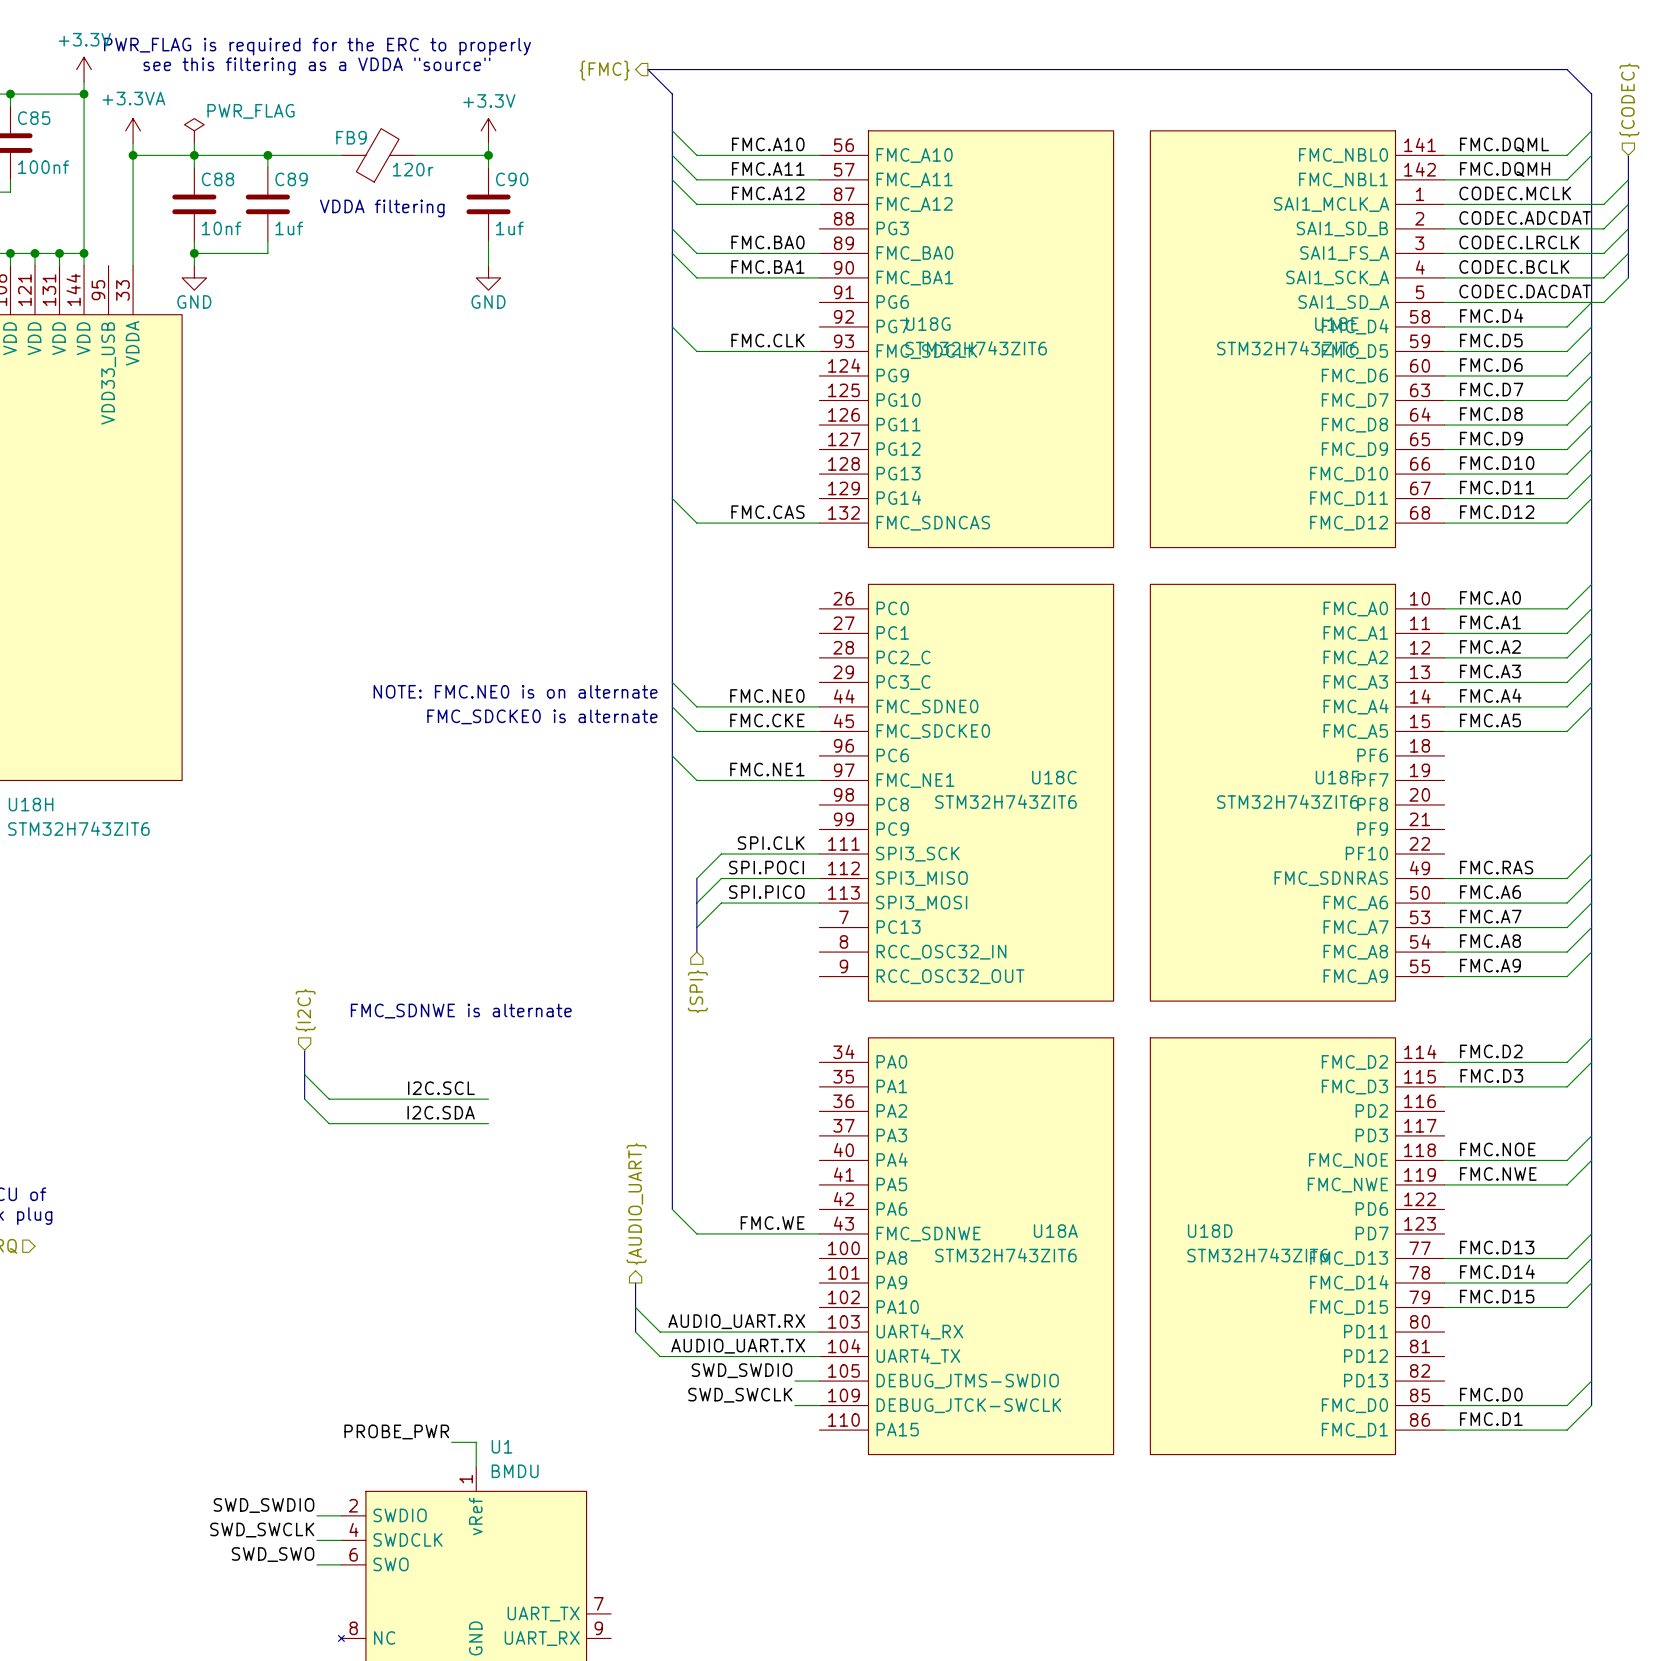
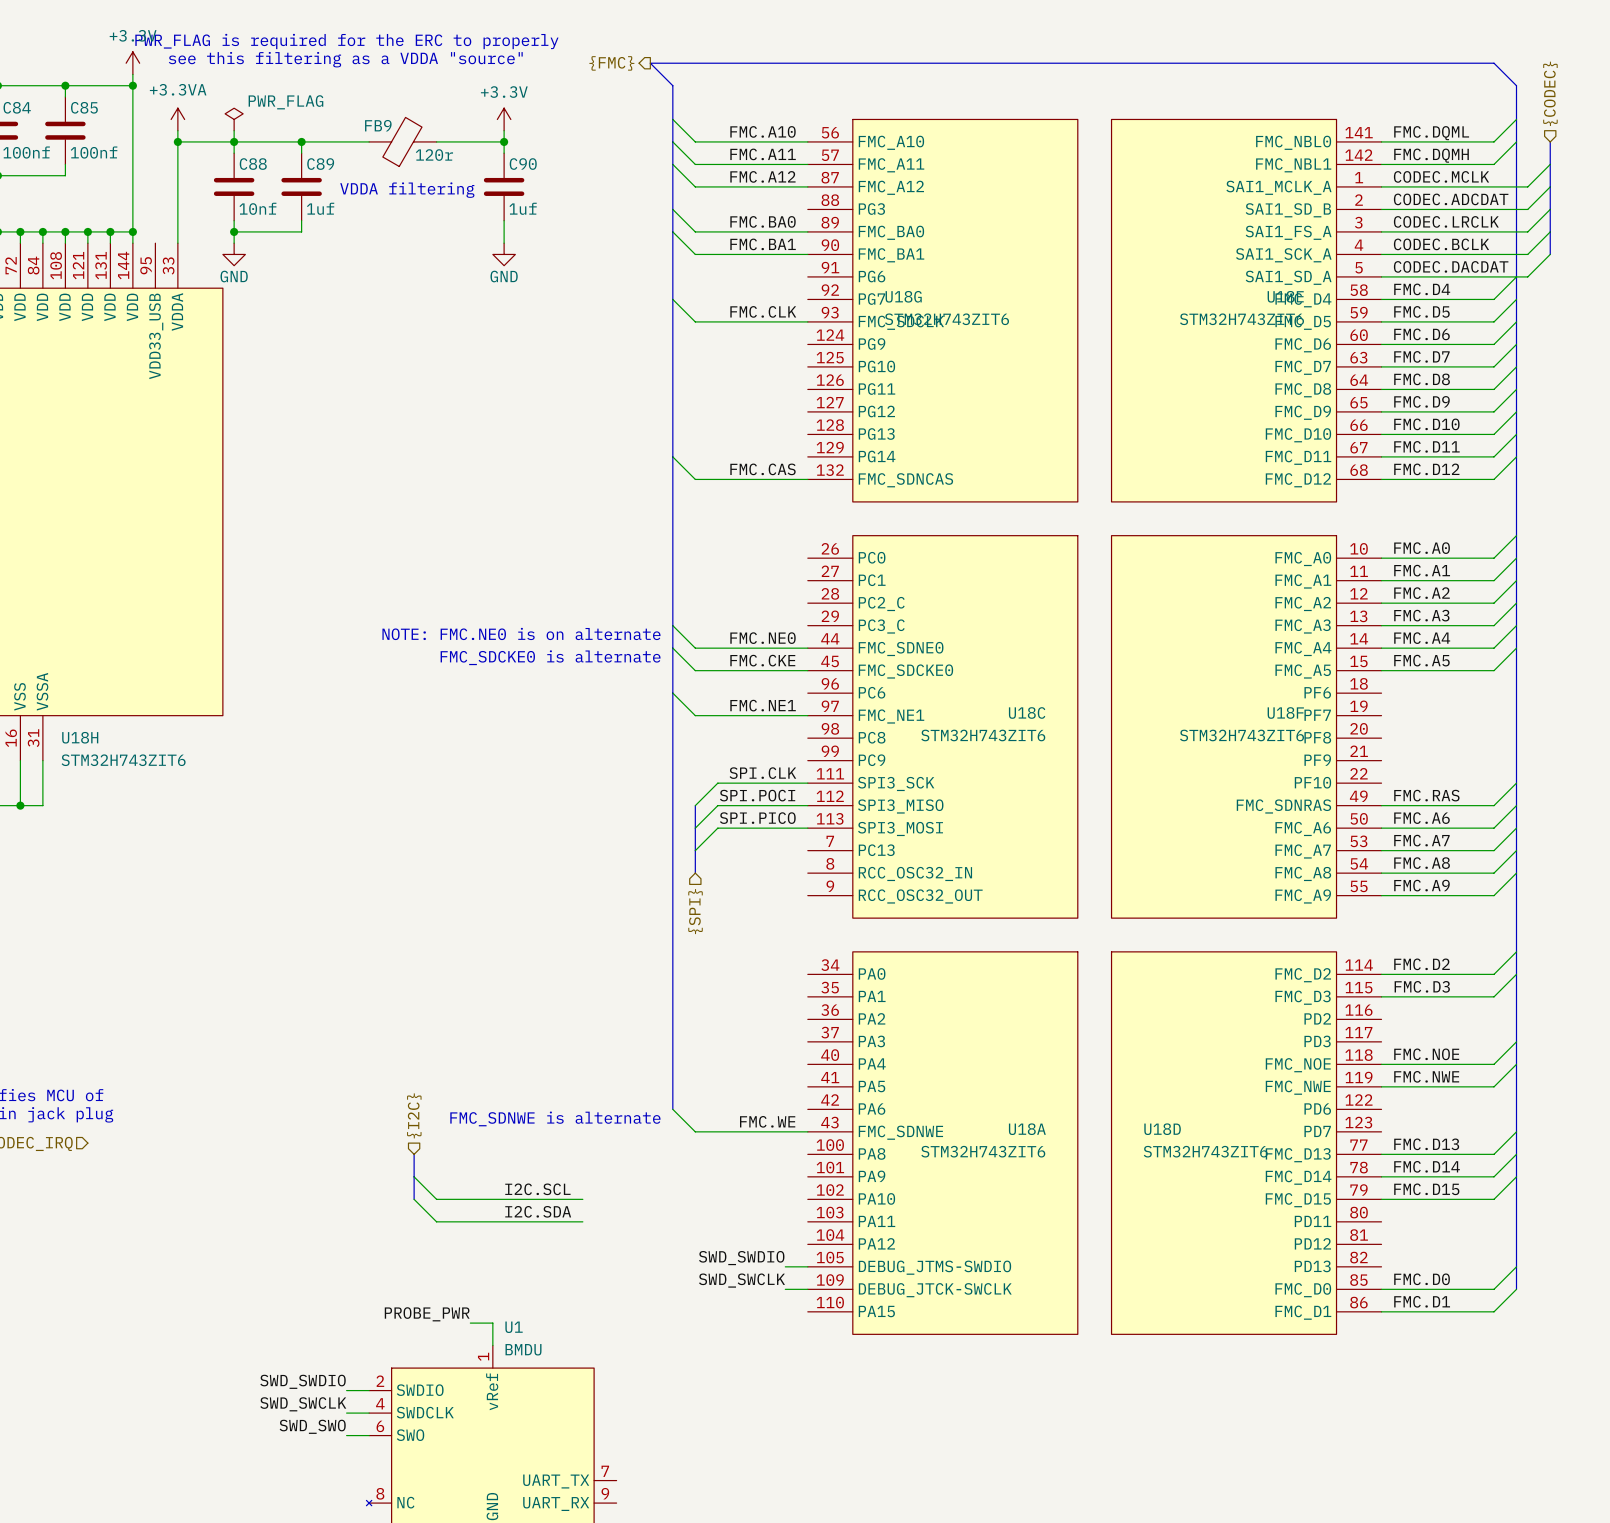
hierarchical label position: {I2C} (305, 1010) -> {I2C} (414, 1115)
text position: FMC_SDNWE is alternate (461, 1011) -> FMC_SDNWE is alternate (555, 1118)
bus: (304, 1050) (304, 1099) -> (414, 1154) (414, 1199)
wire: (304, 1074) (329, 1099) (488, 1099) -> (414, 1176) (436, 1199) (582, 1199)
label position: I2C.SCL (441, 1088) -> I2C.SCL (537, 1189)
wire: (304, 1099) (329, 1123) (488, 1123) -> (414, 1199) (436, 1221) (582, 1221)
label position: I2C.SDA (441, 1112) -> I2C.SDA (538, 1211)
hierarchical label: {AUDIO_UART} (636, 1204) -> none
bus: (635, 1282) (635, 1332) -> none
wire: (635, 1307) (660, 1332) (819, 1332) -> none
label: AUDIO_UART.RX (736, 1321) -> none
U18A pin name: UART4_RX (919, 1331) -> PA11 (877, 1221)
wire: (635, 1332) (660, 1356) (819, 1356) -> none
label: AUDIO_UART.TX (738, 1346) -> none
U18A pin name: UART4_TX (918, 1356) -> PA12 (876, 1243)

